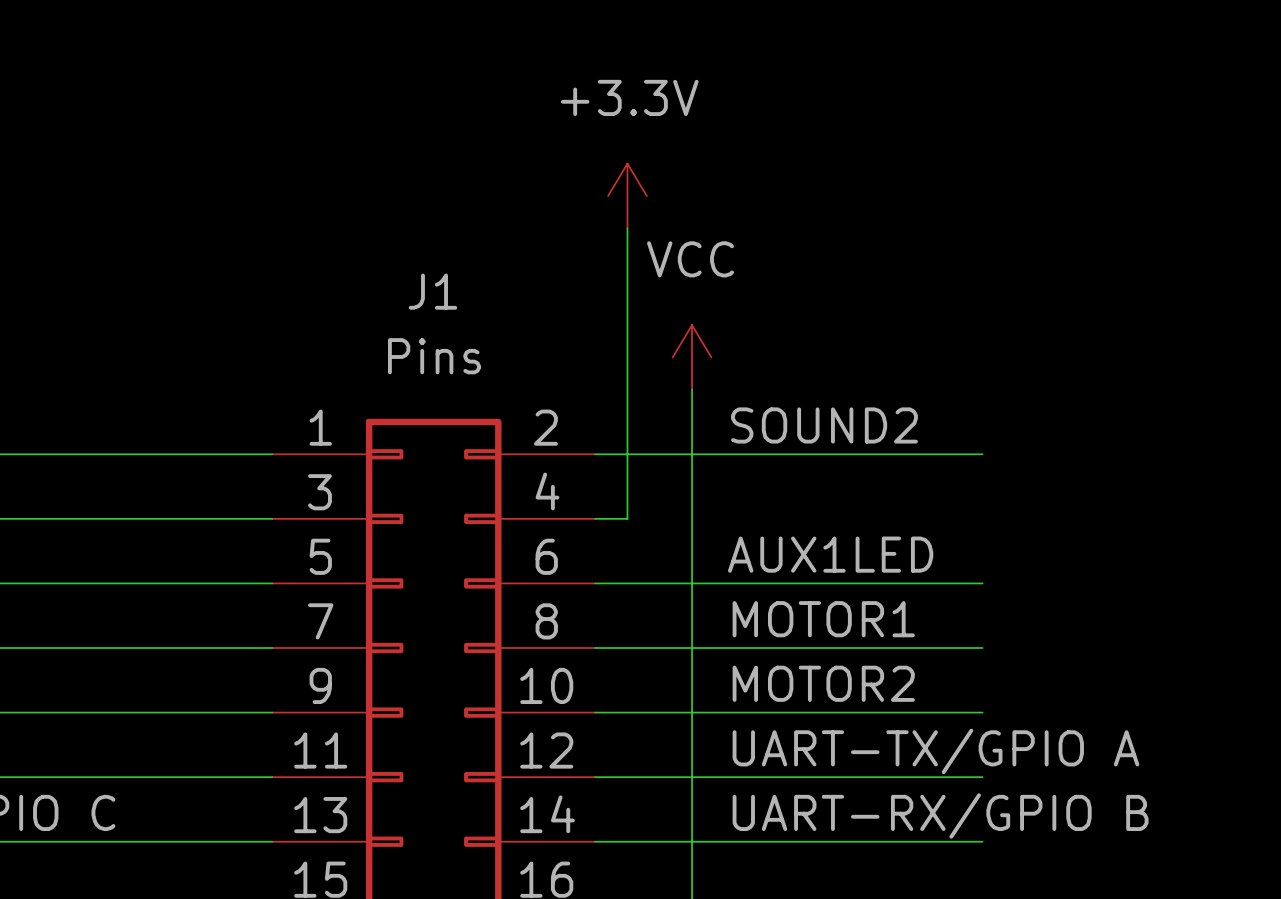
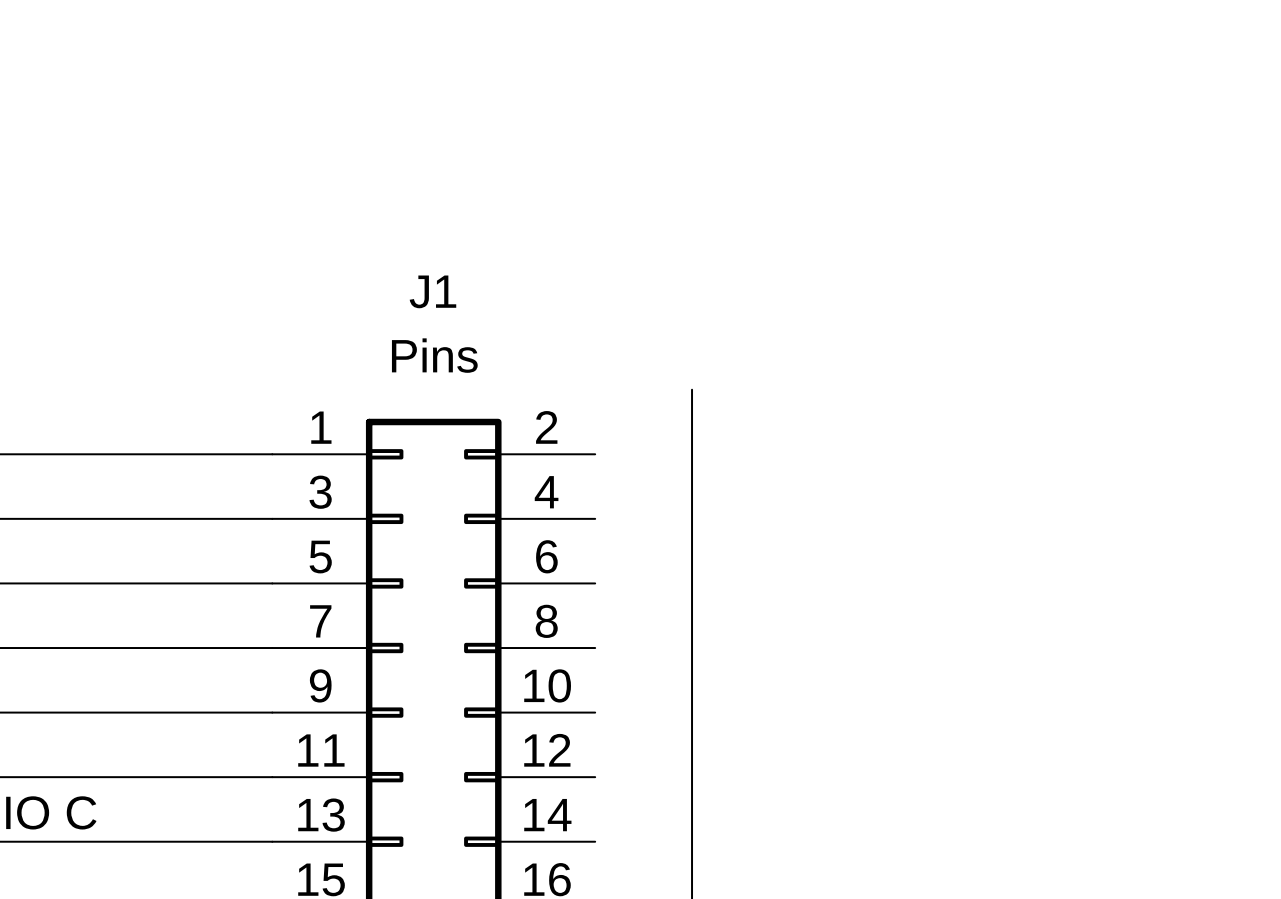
power symbol: +3.3V (627, 196) -> none
wire: (627, 228) (627, 518) (595, 518) -> none
power symbol: VCC (692, 357) -> none
label: SOUND2 (824, 425) -> none
wire: (595, 454) (982, 454) -> none
label: AUX1LED (830, 554) -> none
wire: (595, 583) (982, 583) -> none
label: MOTOR1 (823, 619) -> none
wire: (595, 648) (982, 648) -> none
label: MOTOR2 (823, 683) -> none
wire: (595, 712) (982, 712) -> none
label: UART-TX/GPIO A (935, 751) -> none
wire: (595, 777) (982, 777) -> none
label: UART-RX/GPIO B (940, 815) -> none
wire: (595, 841) (982, 841) -> none

